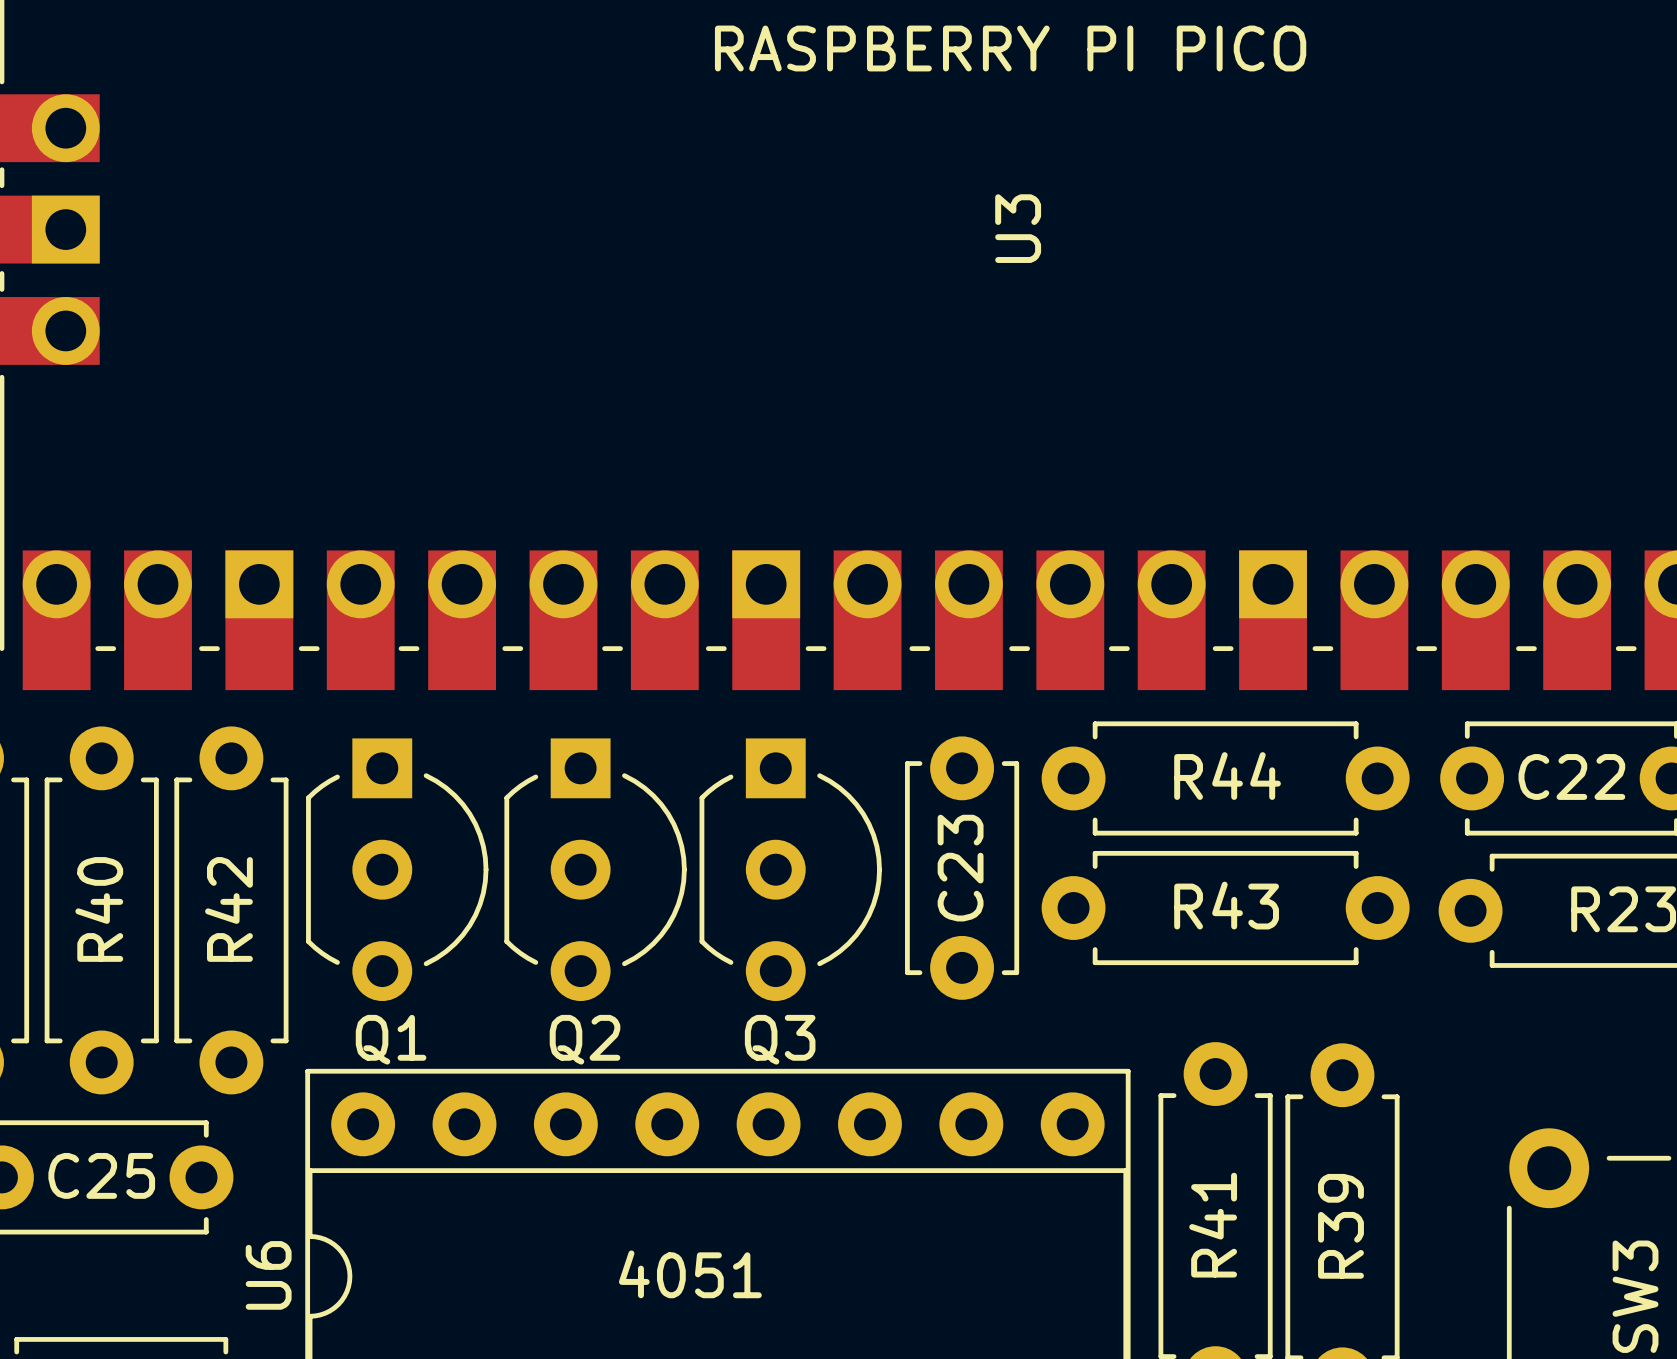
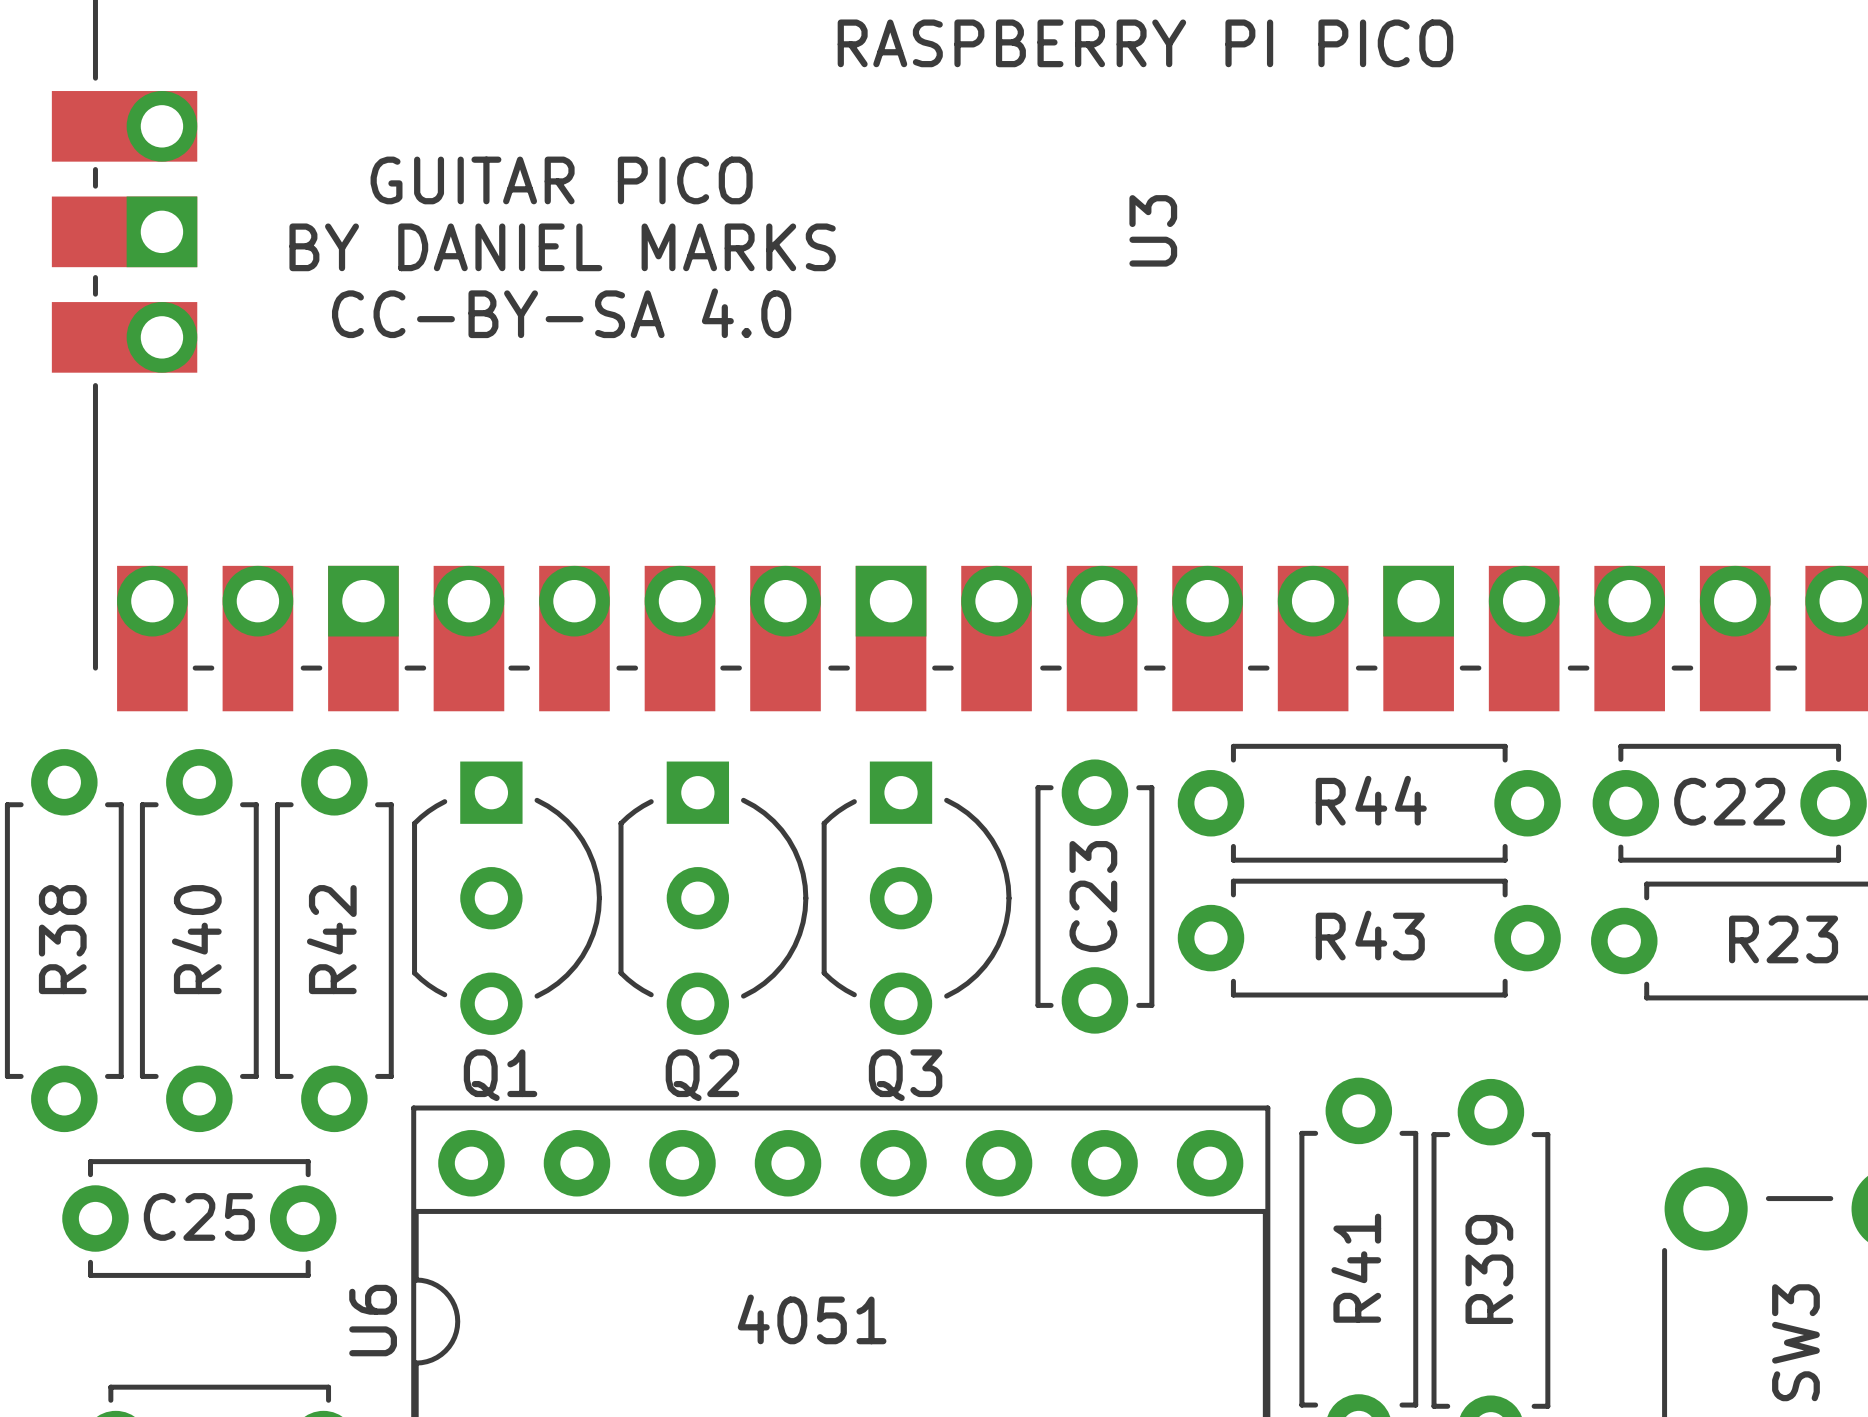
text: none -> GUITAR PICO (561, 180)
text: none -> BY DANIEL MARKS (562, 247)
text: none -> CC-BY-SA 4.0 (561, 313)

